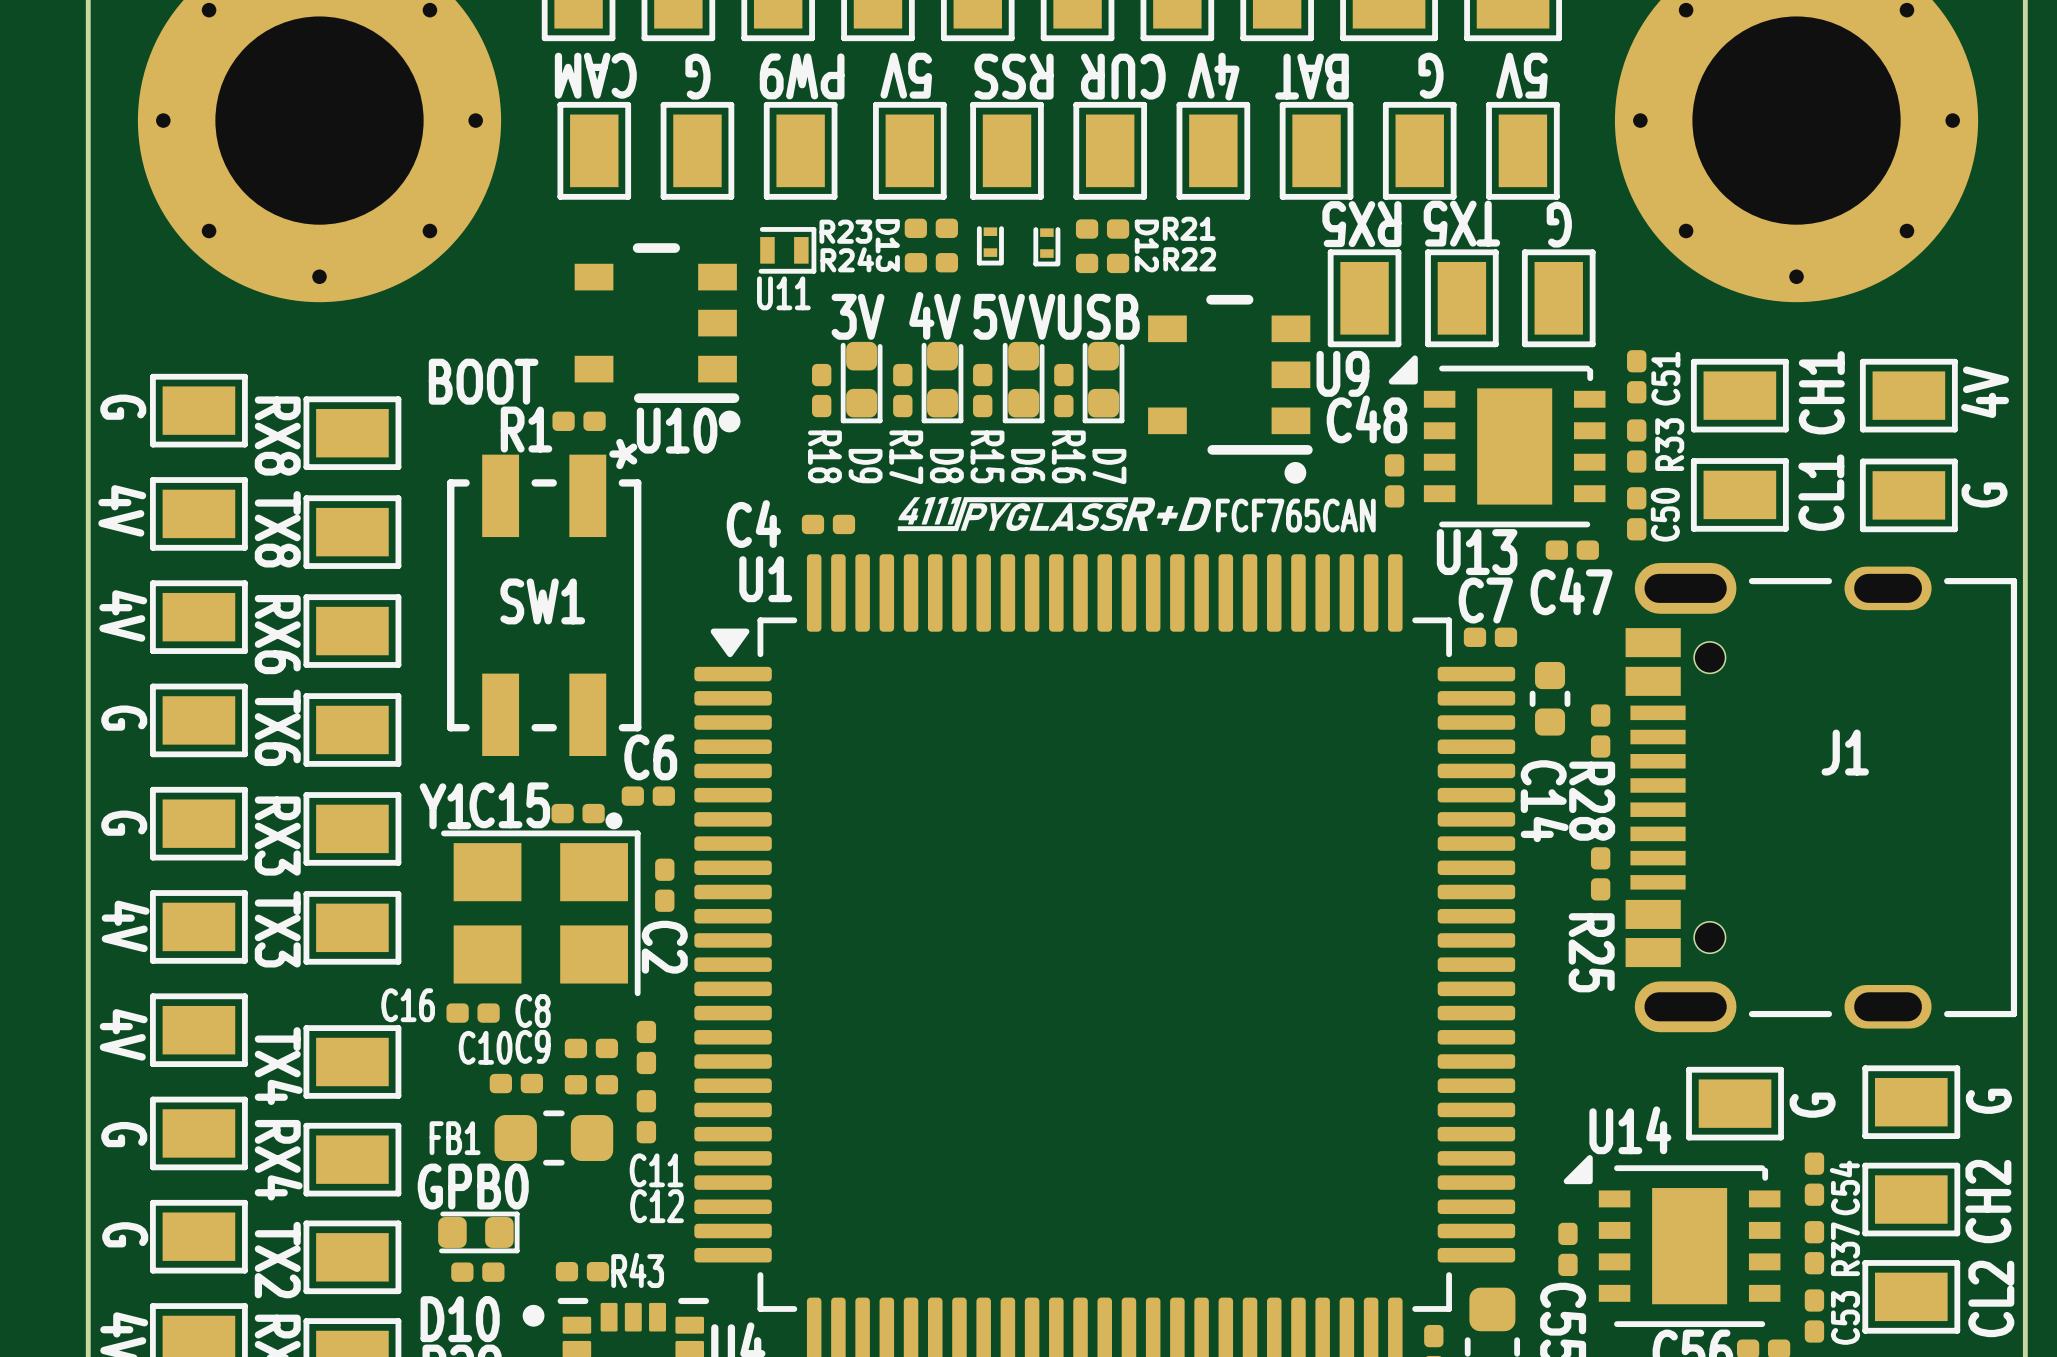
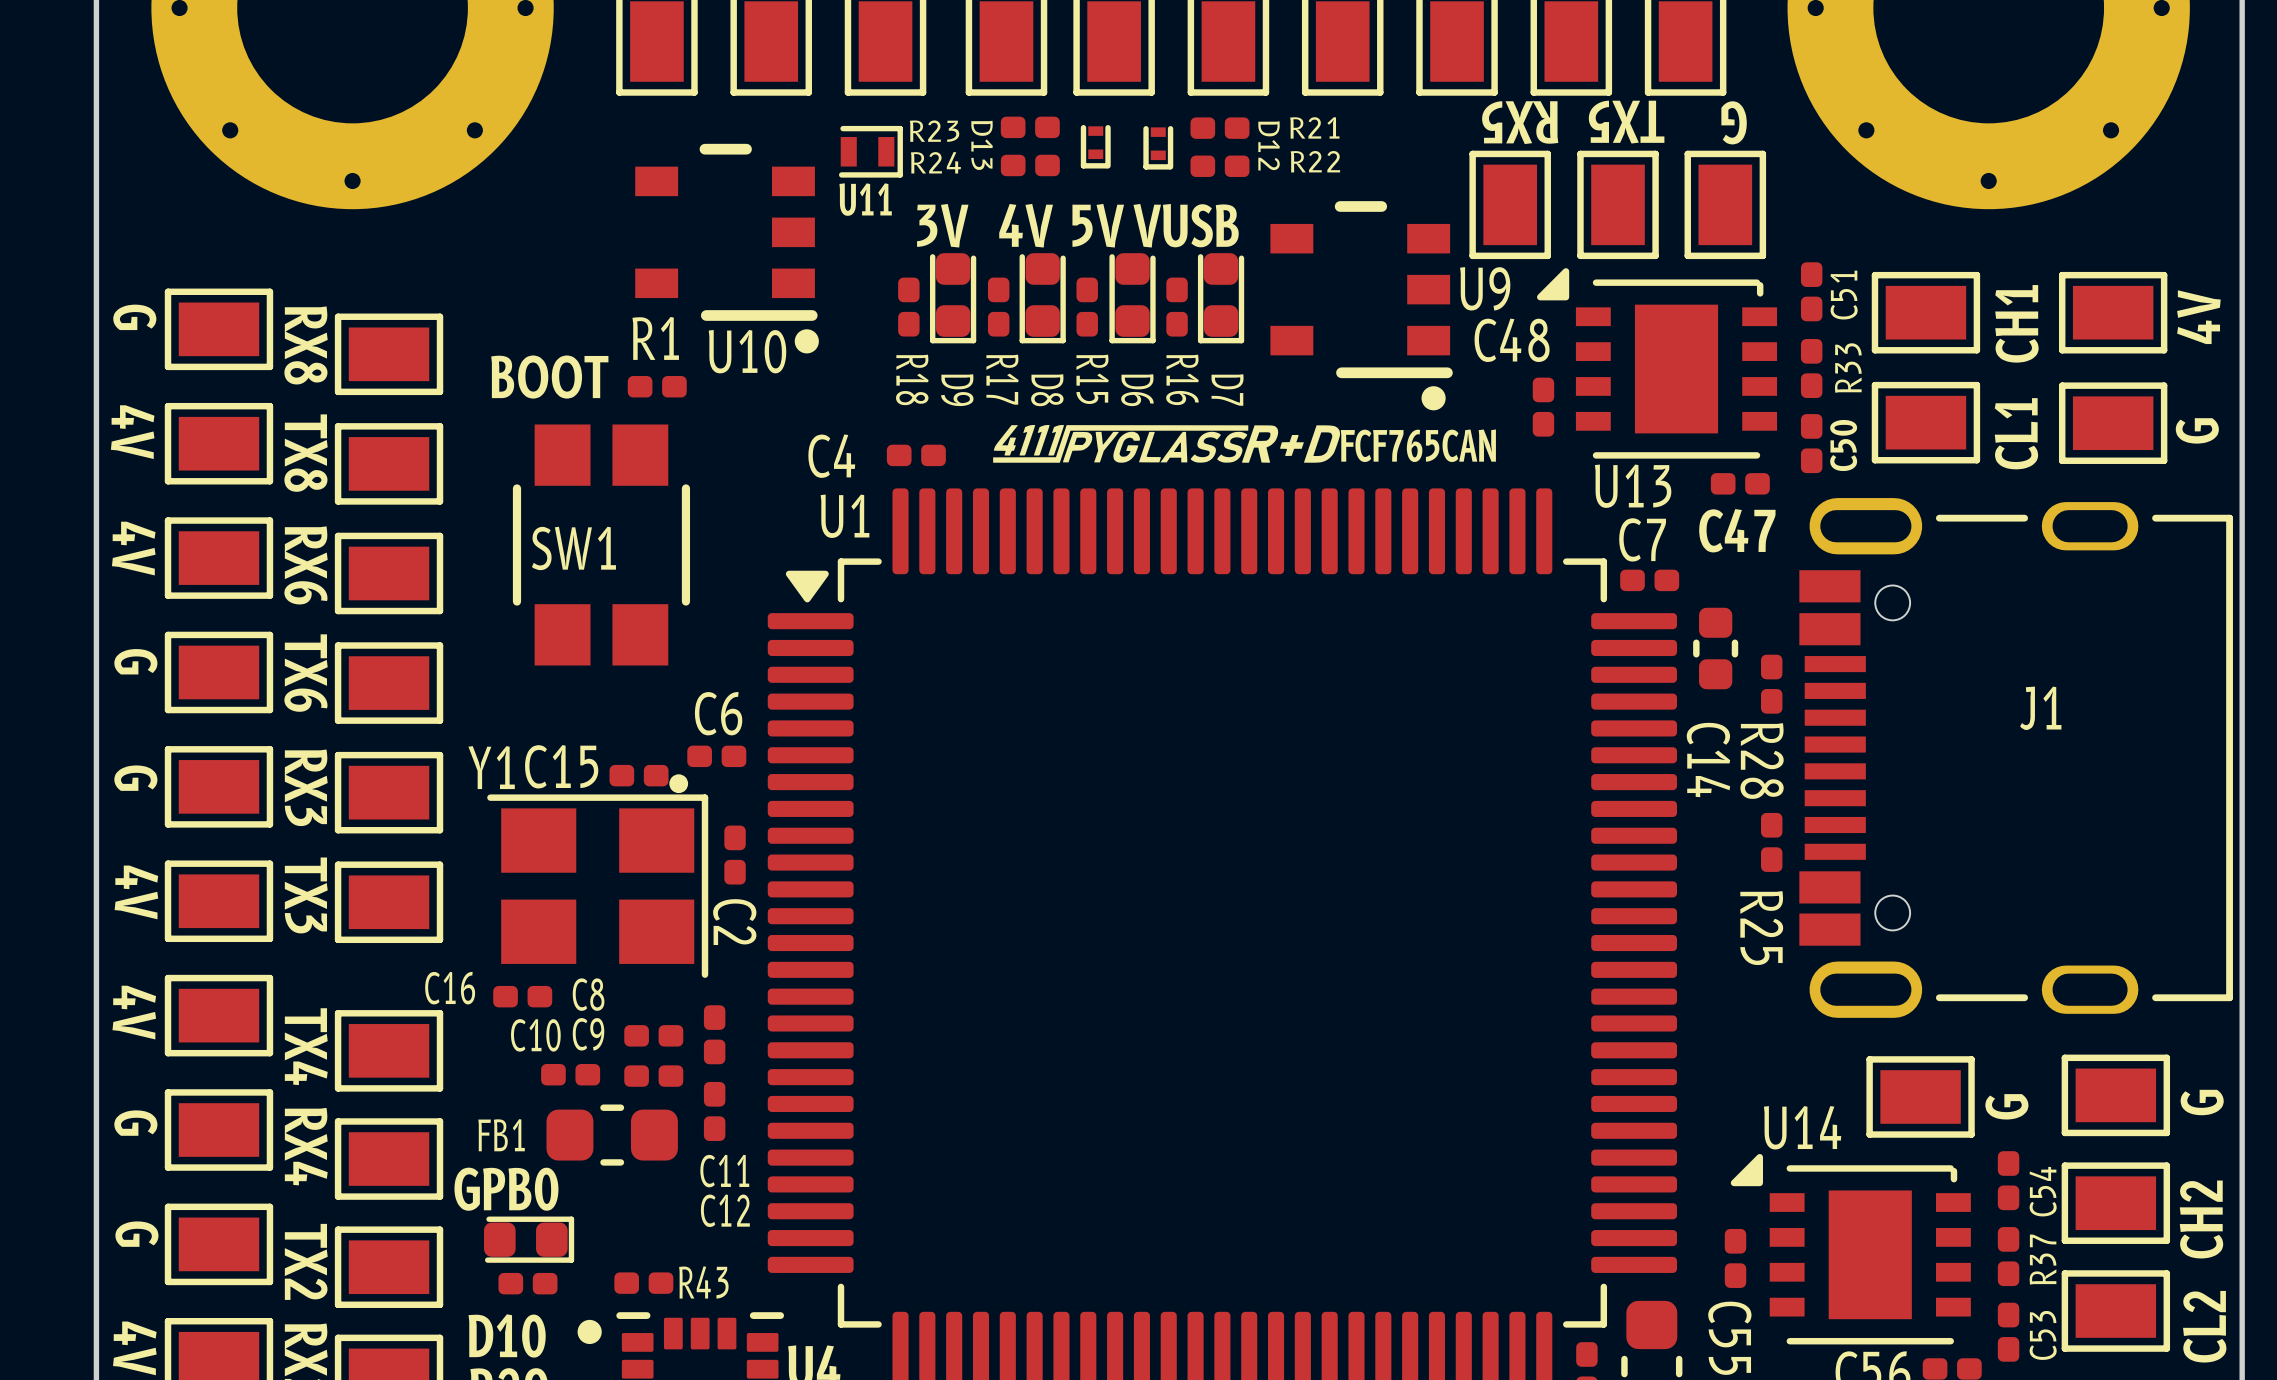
text position: BOOT (483, 381) -> BOOT (549, 377)
R1 position: (579, 421) -> (657, 386)
R1 name position: R1 (526, 429) -> R1 (655, 338)
SW1 footprint: [447, 454, 642, 757] -> [512, 424, 691, 666]

